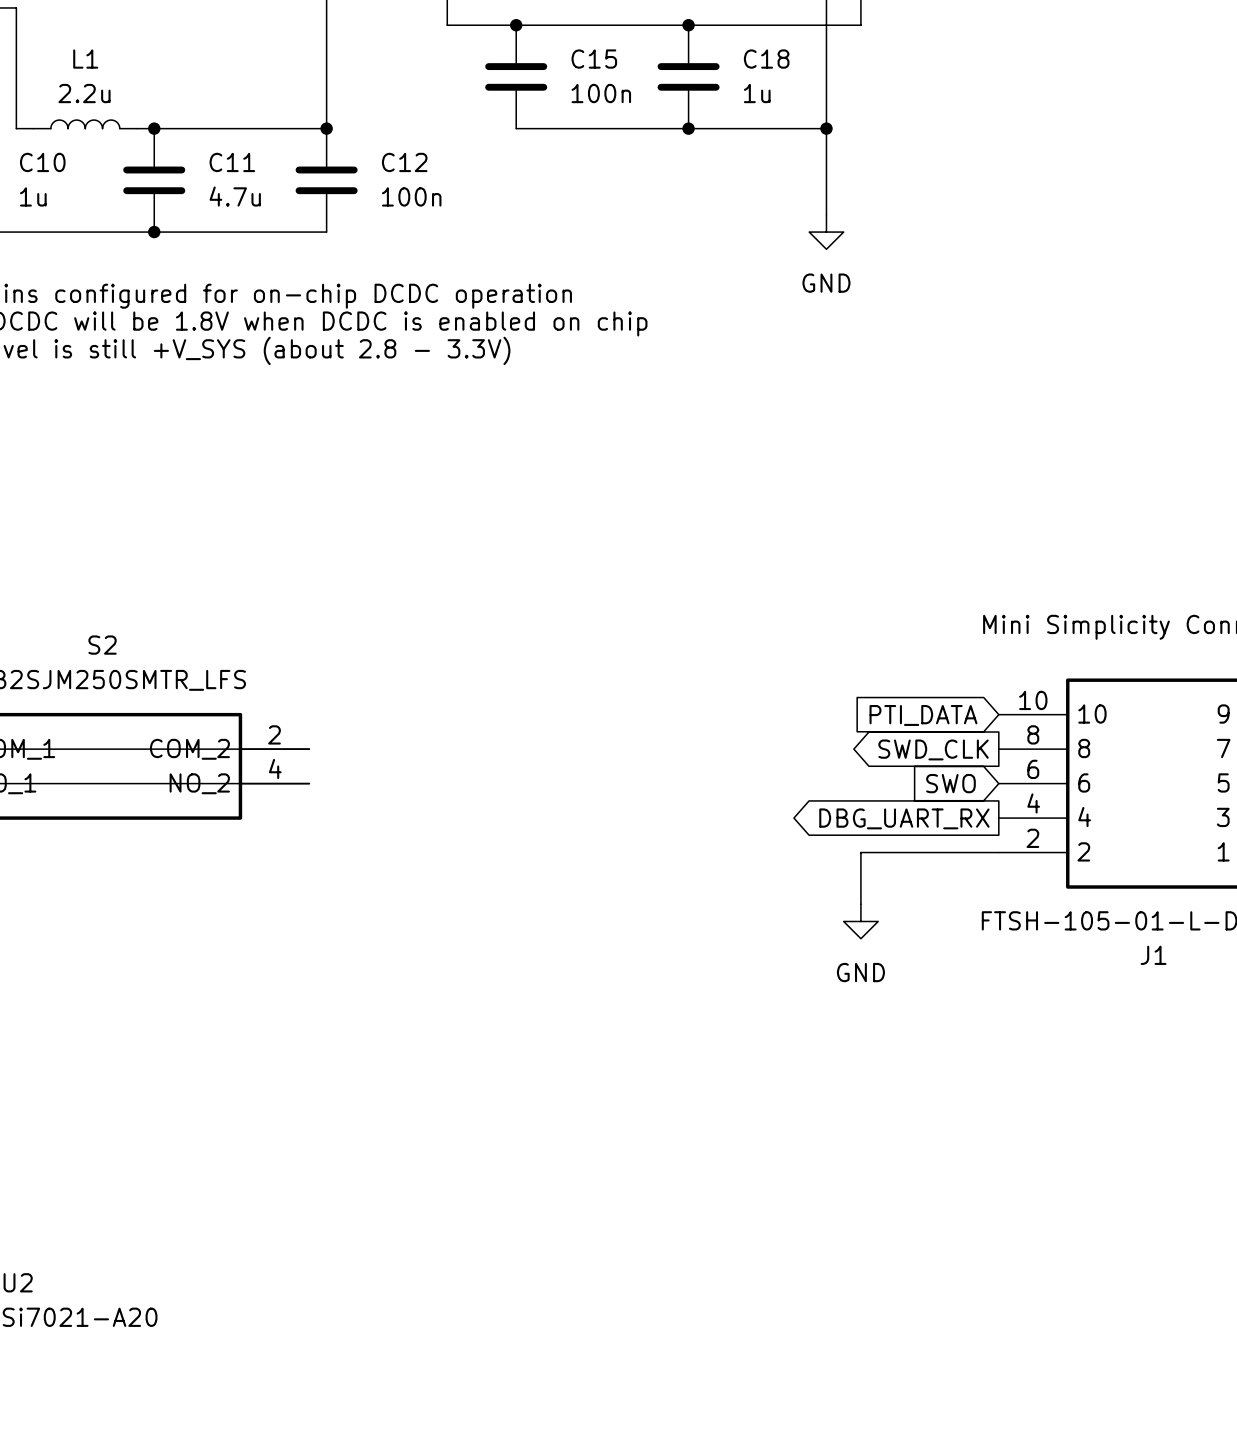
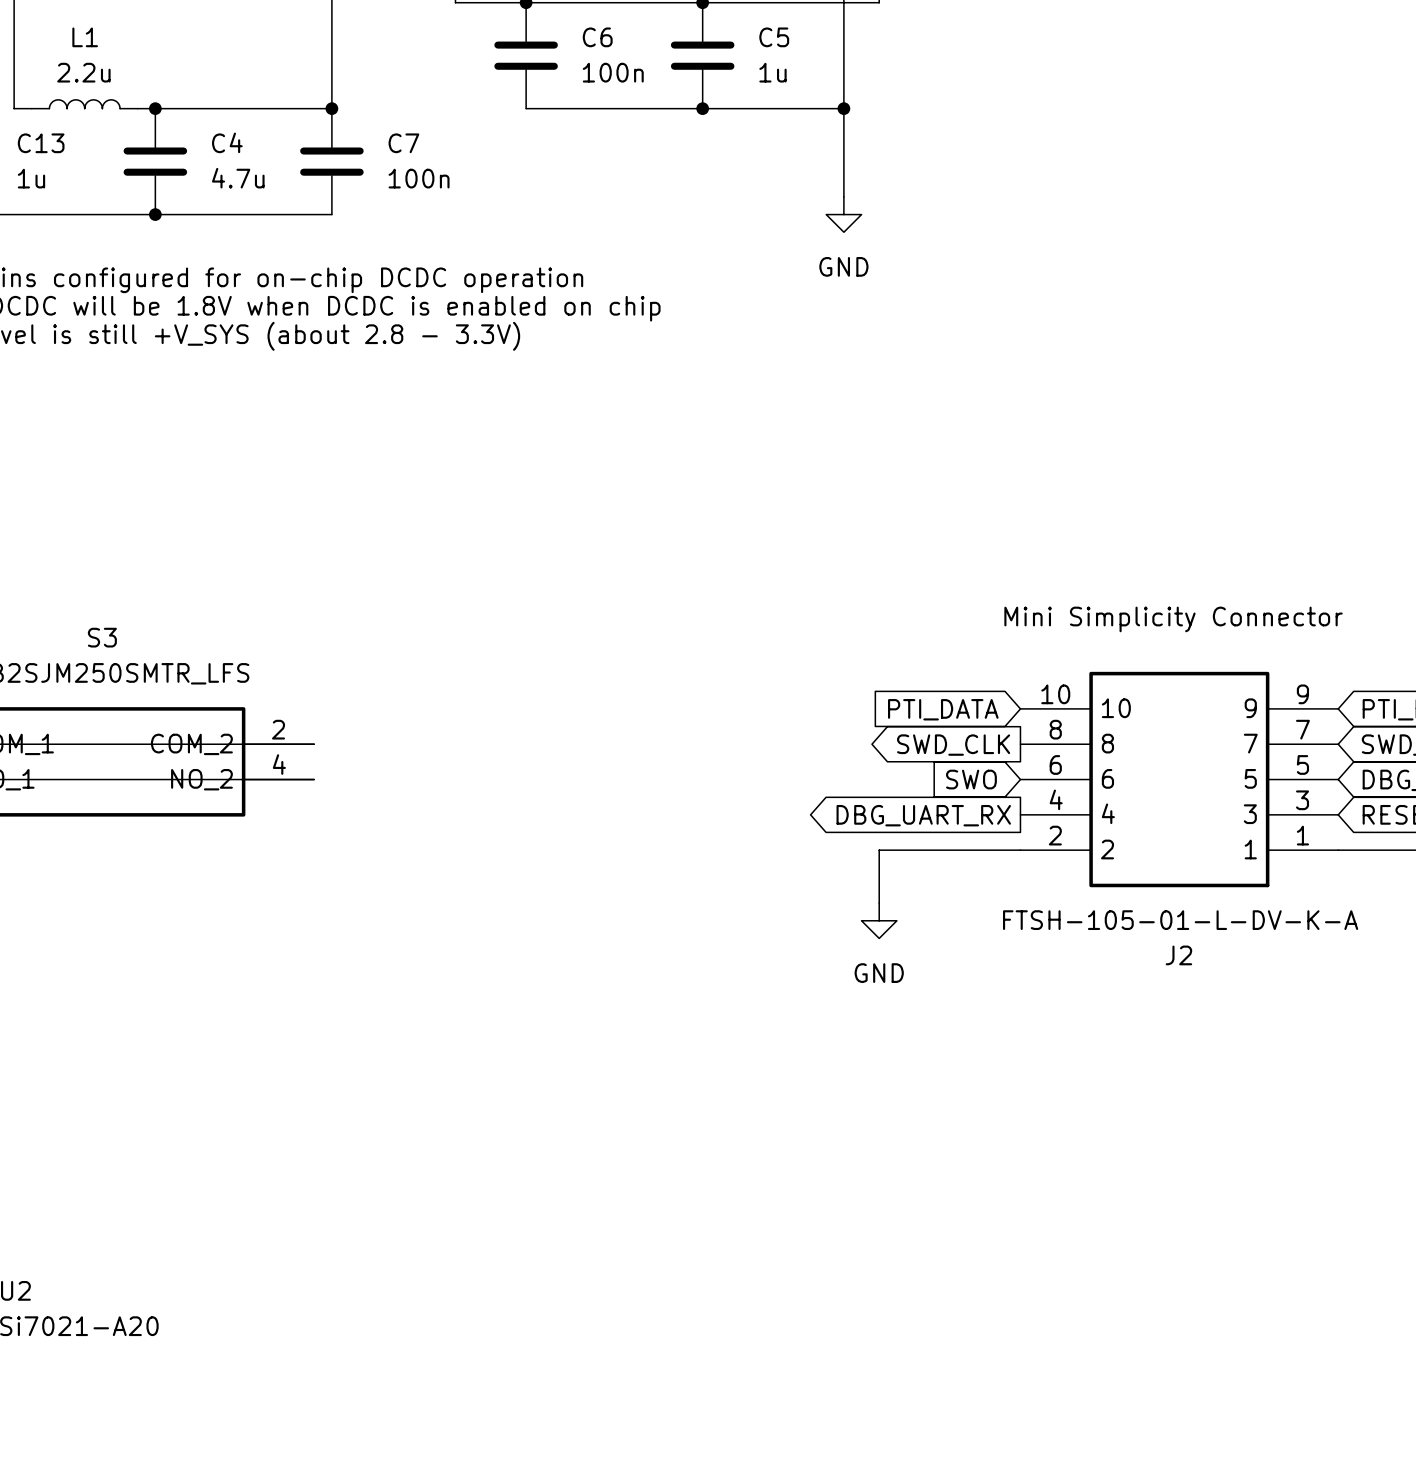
C15 name: C15 (594, 59) -> C6 (597, 37)
C18 name: C18 (766, 59) -> C5 (774, 37)
C10 name: C10 (42, 162) -> C13 (41, 143)
C11 name: C11 (232, 162) -> C4 (227, 142)
C12 name: C12 (404, 162) -> C7 (403, 143)
S2 name: S2 (102, 645) -> S3 (102, 637)
J1 name: J1 (1153, 955) -> J2 (1178, 955)

